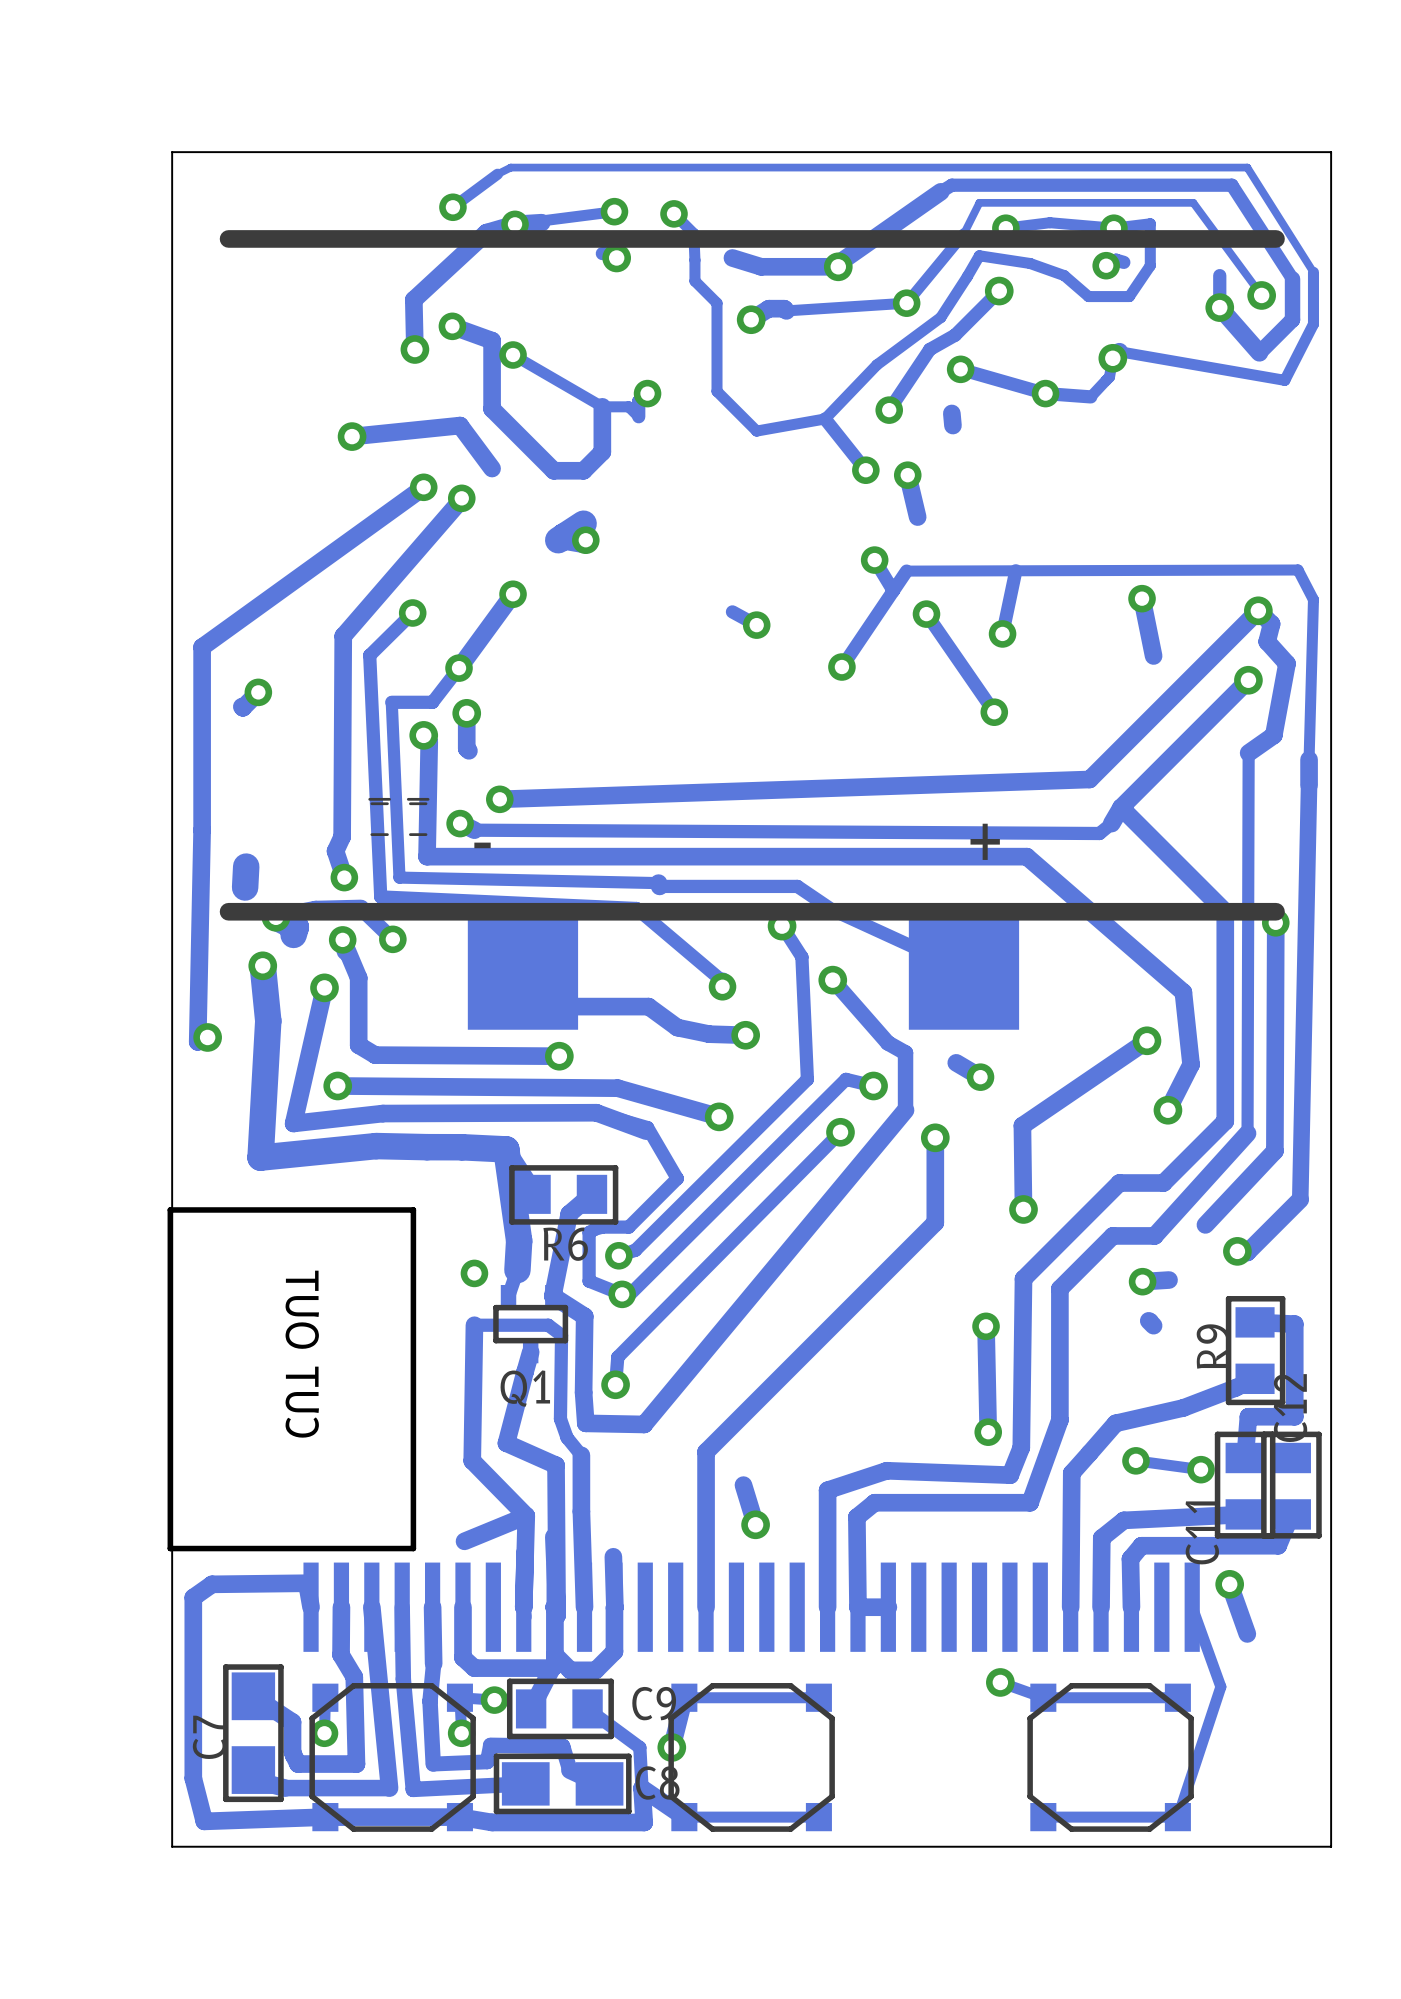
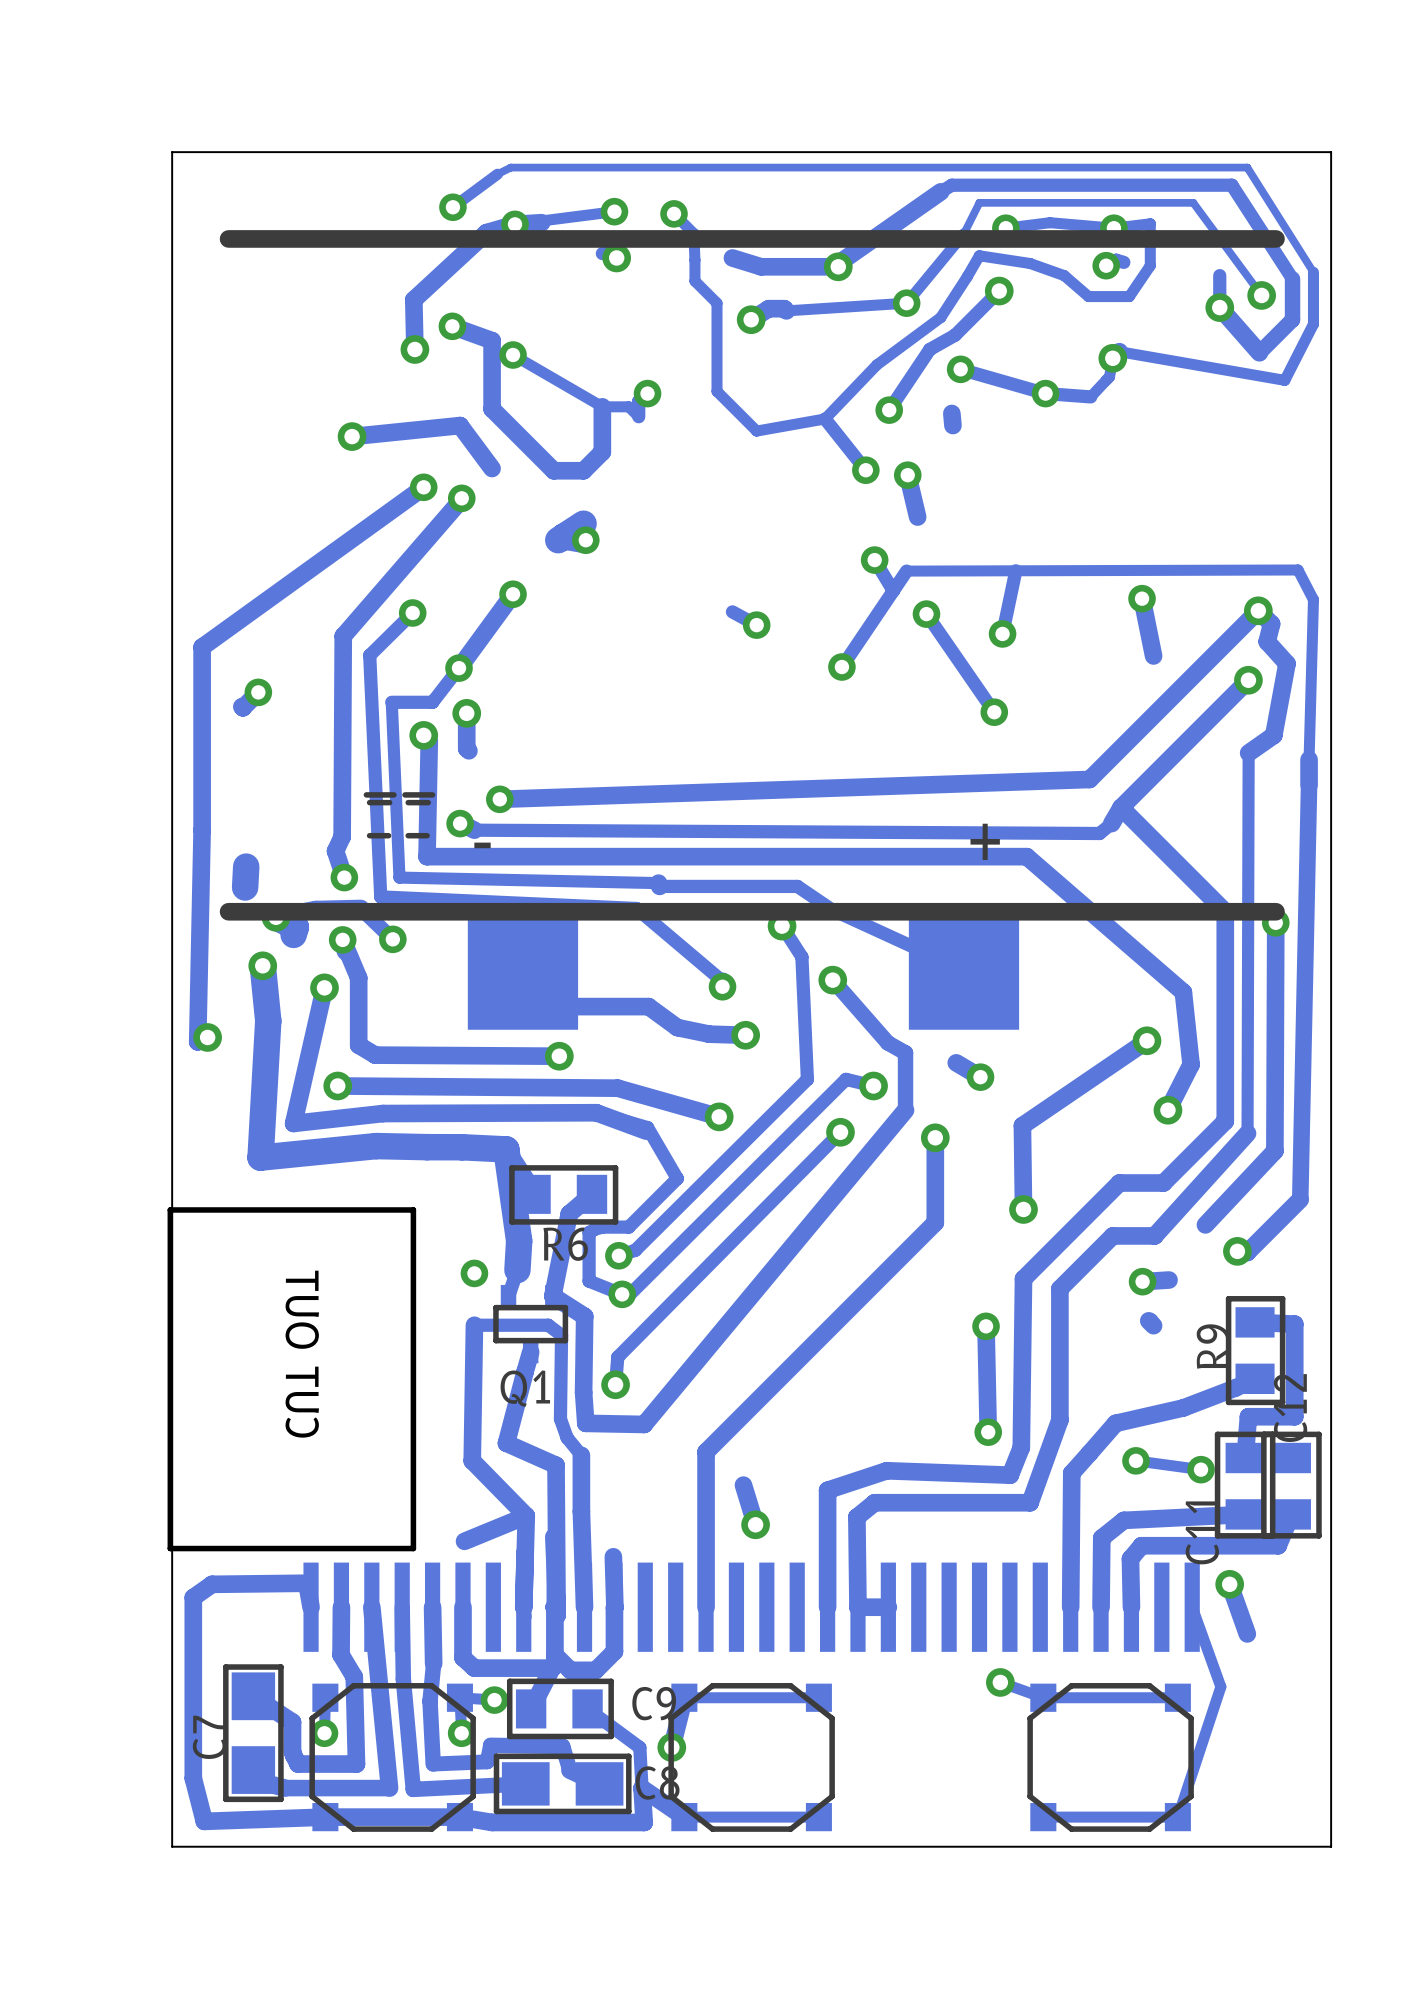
part footprint: [368, 797, 391, 836] -> [363, 792, 397, 839]
part footprint: [406, 797, 430, 836] -> [402, 792, 436, 839]

